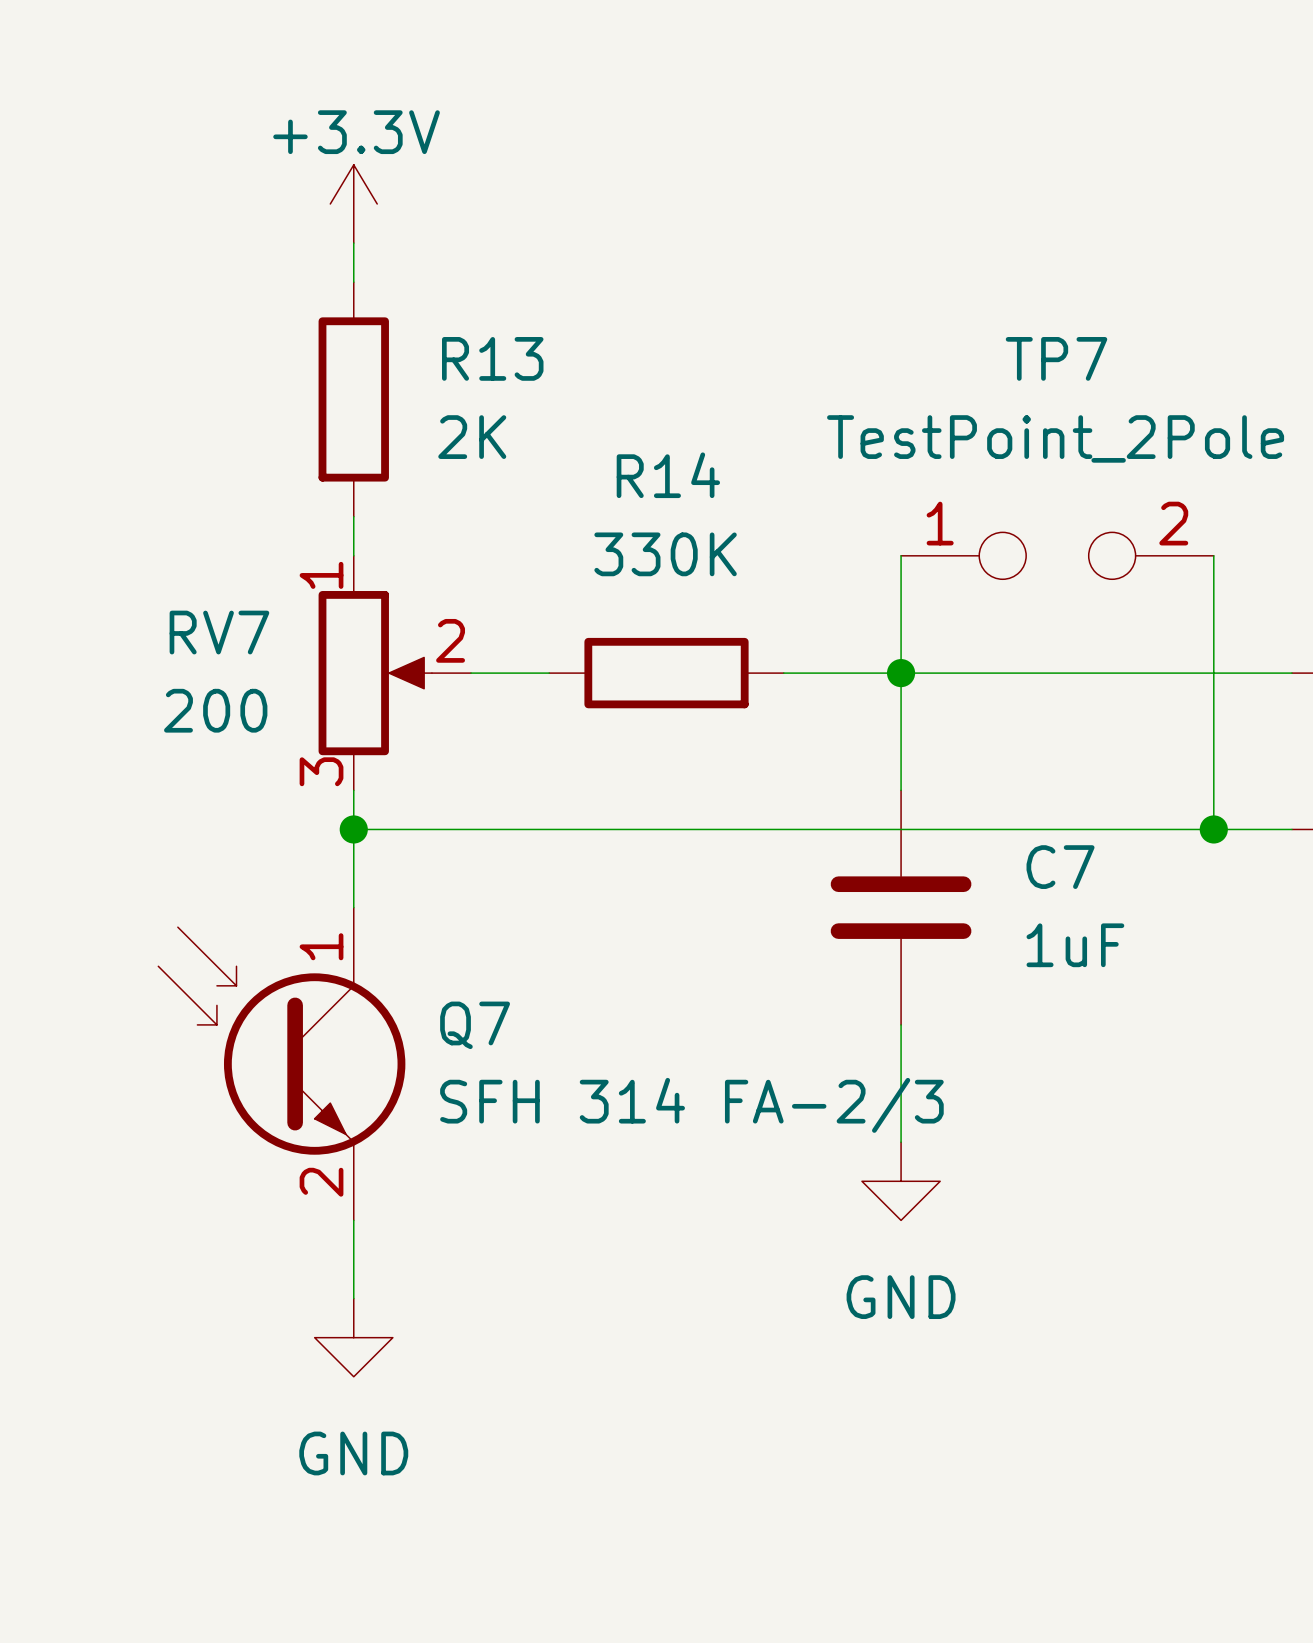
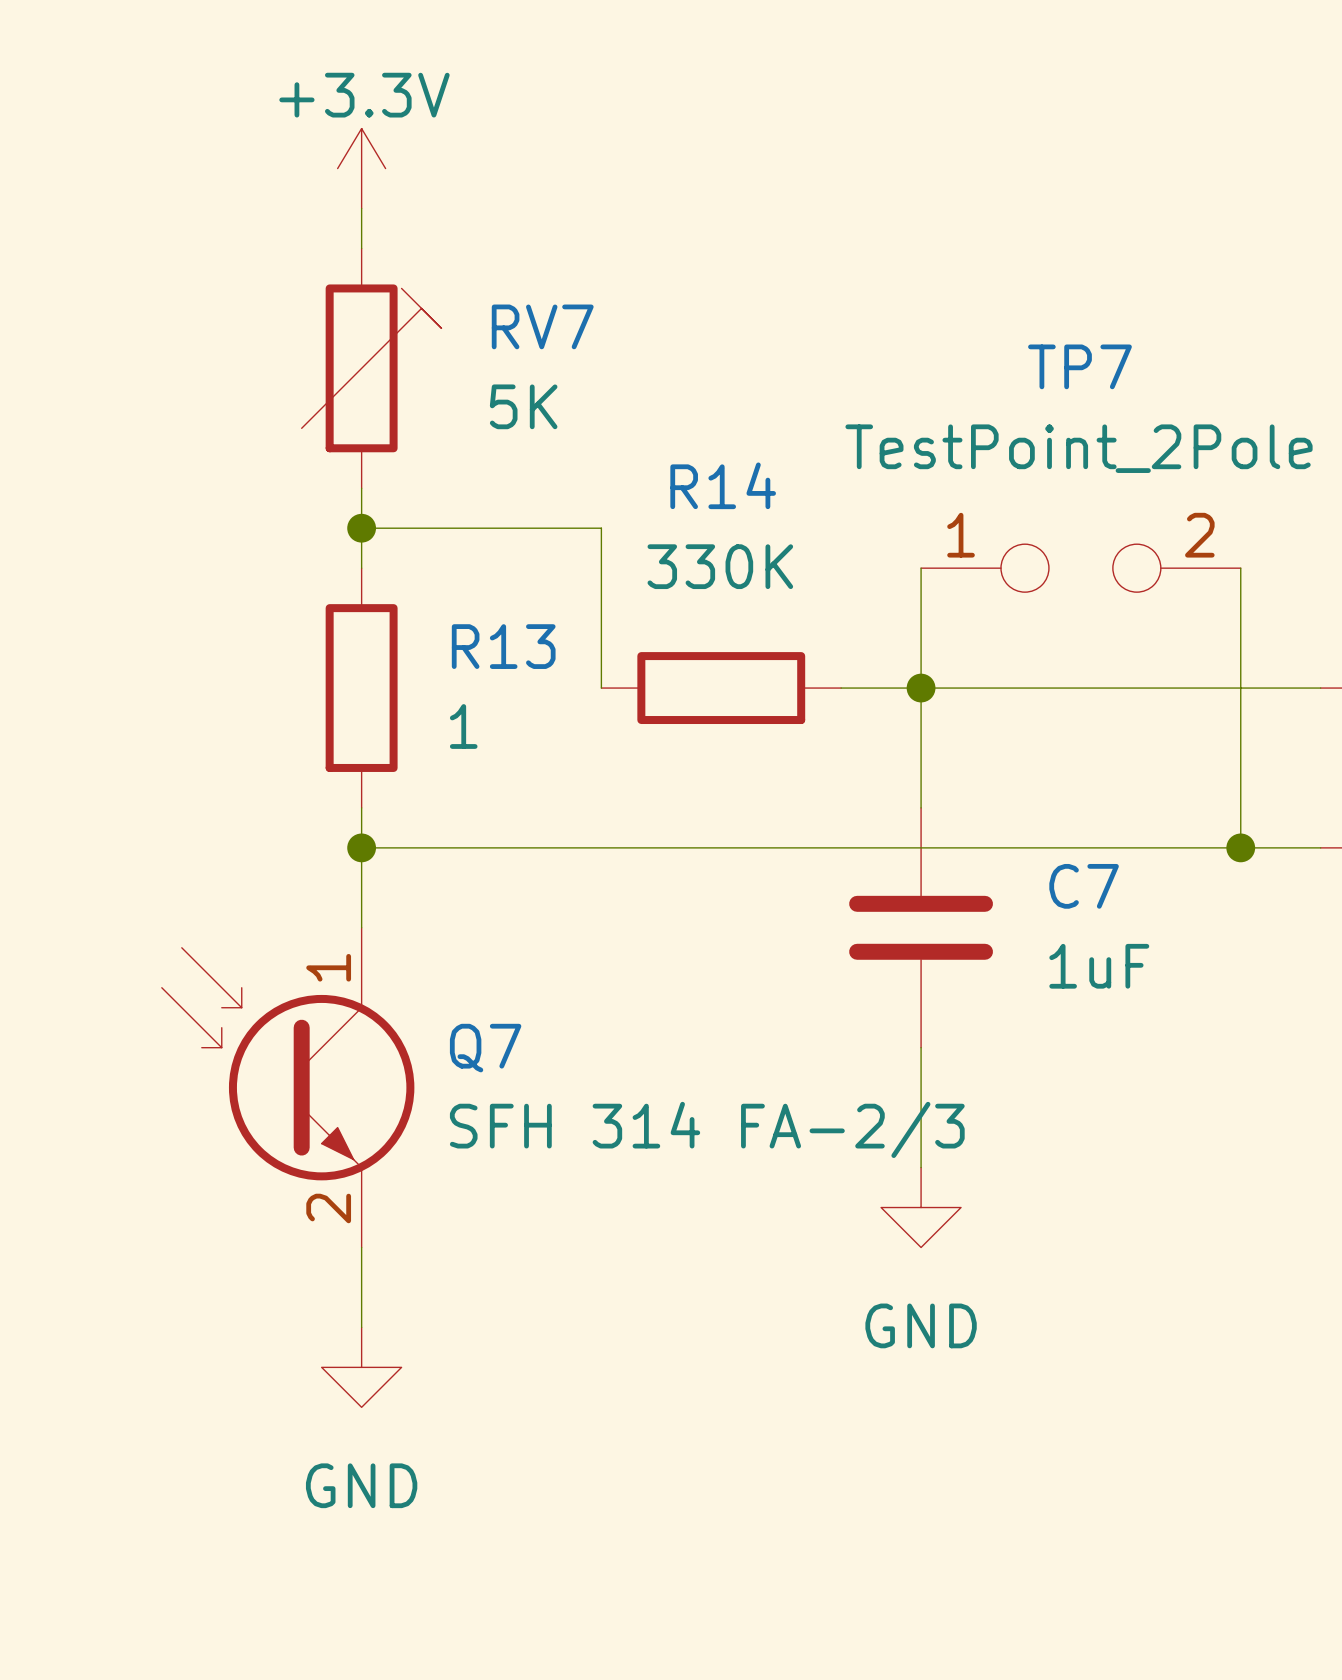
power symbol position: +3.3V (353, 203) -> +3.3V (361, 168)
R13 position: (353, 399) -> (361, 688)
R13 value: 2K (472, 437) -> 1 (463, 726)
wire: none -> (361, 488) (361, 528) (601, 528) (601, 688)
junction: none -> (361, 528)
RV7 symbol: [318, 555, 472, 791] -> [301, 248, 442, 489]
RV7 name position: RV7 (219, 632) -> RV7 (542, 326)
wire: (471, 673) (549, 673) -> none
R14 position: (666, 673) -> (721, 688)
RV7 value: 200 (215, 710) -> 5K (523, 406)

